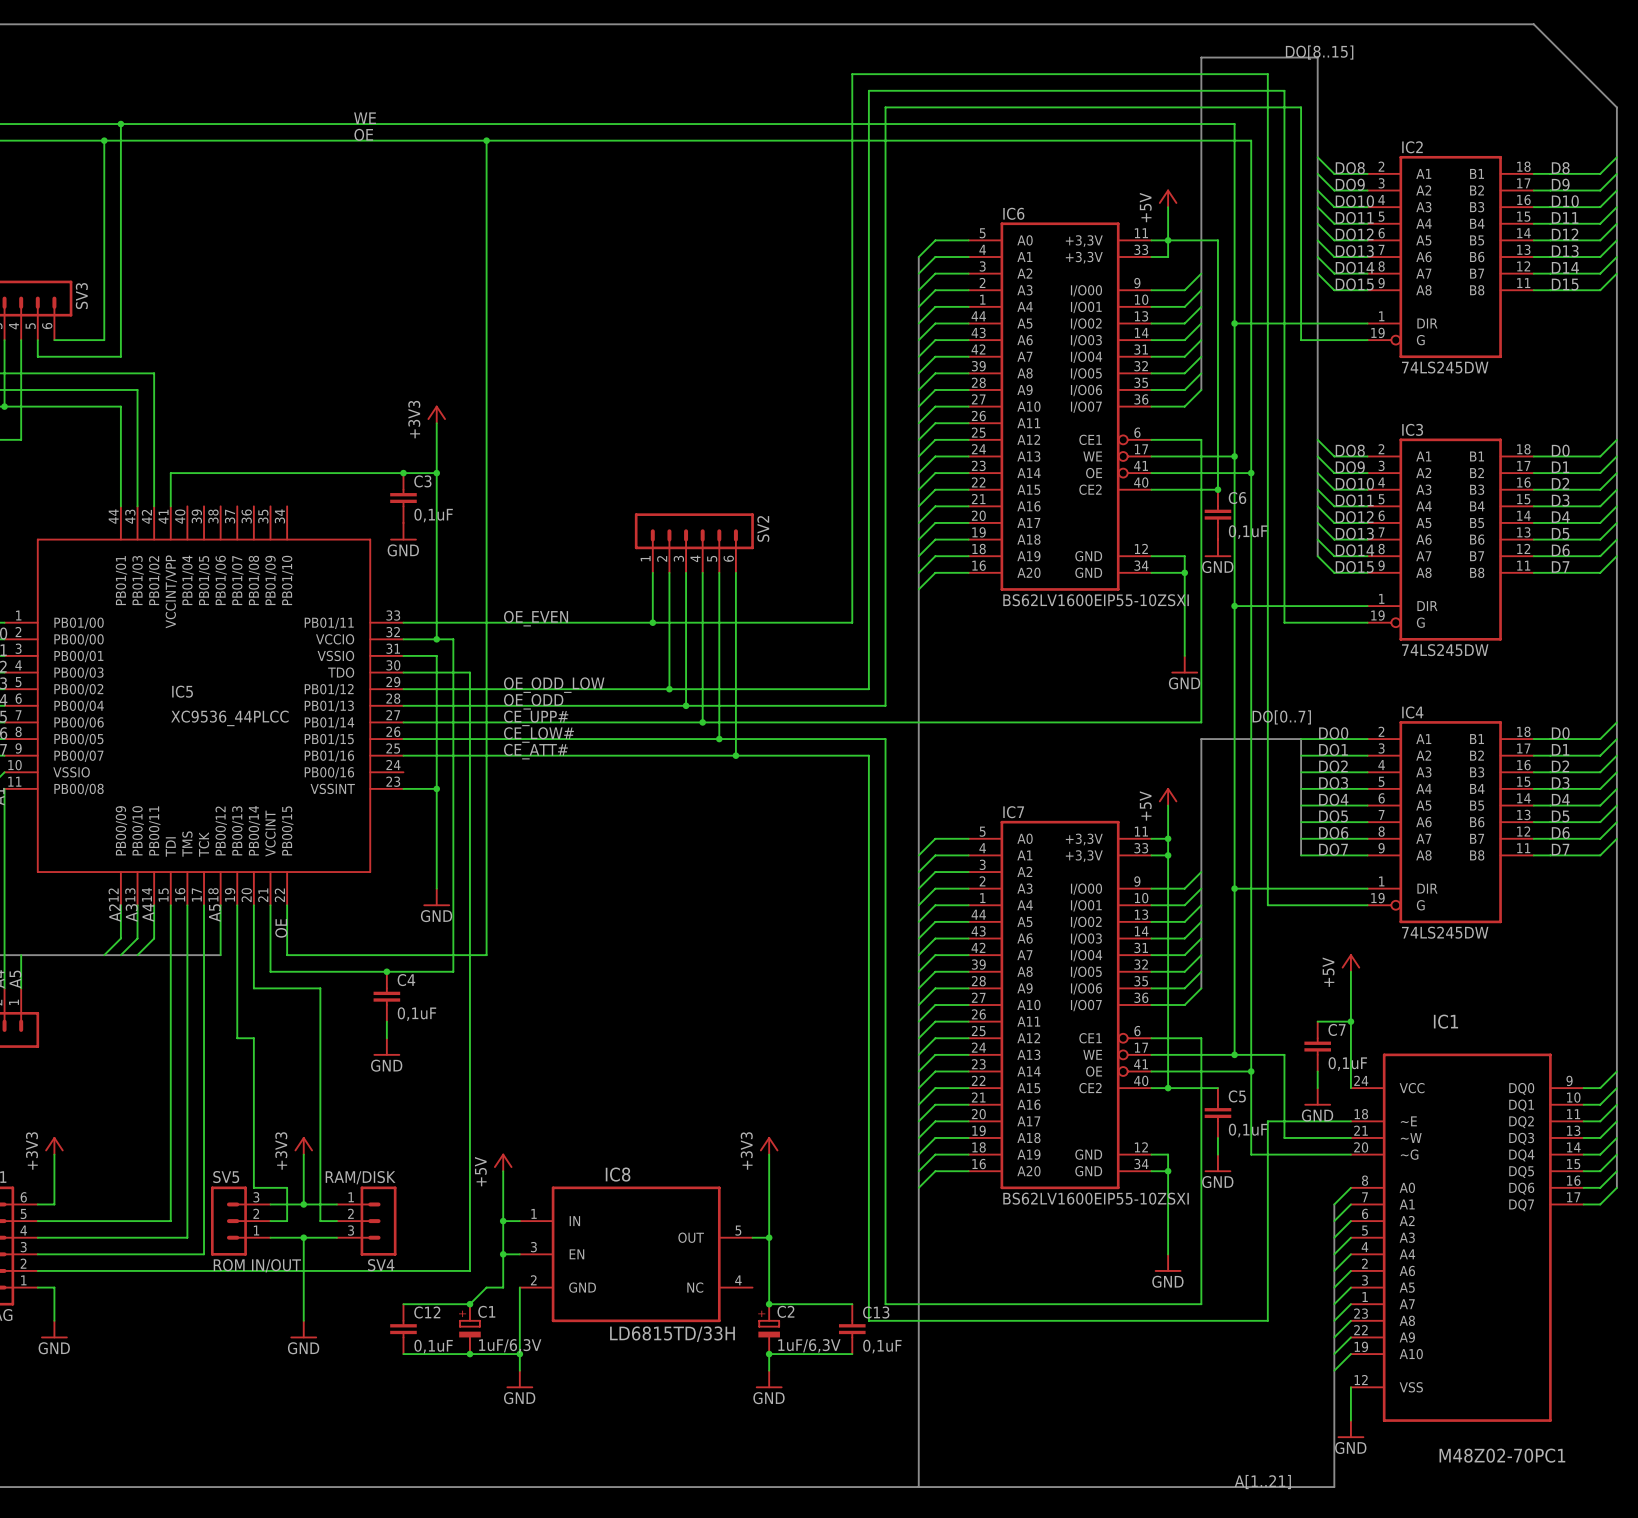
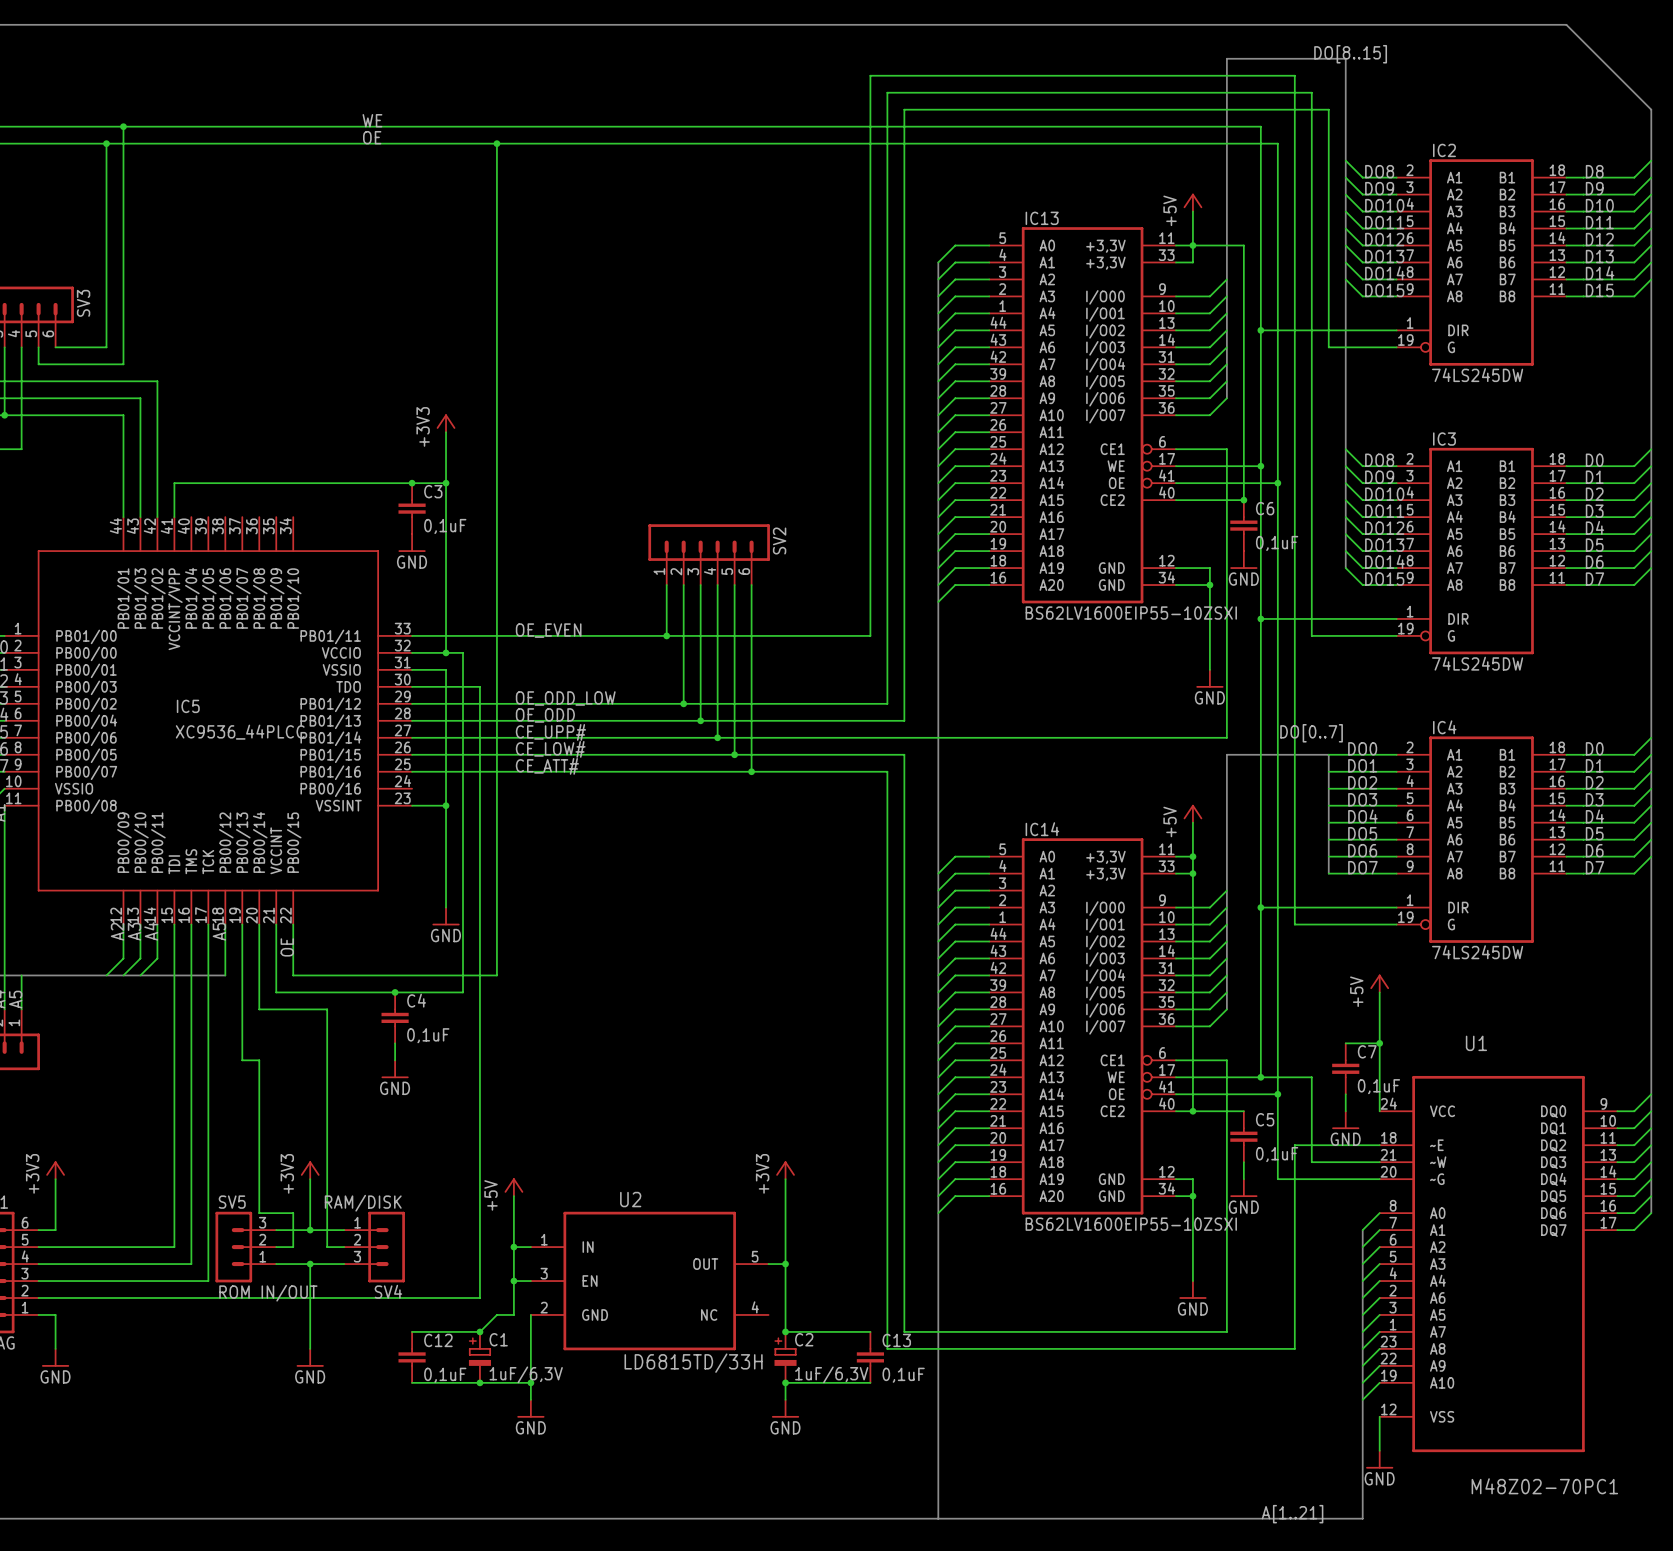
IC6 name: IC6 (1013, 213) -> IC13 (1042, 218)
IC7 name: IC7 (1013, 812) -> IC14 (1042, 829)
IC1 name: IC1 (1445, 1021) -> U1 (1476, 1043)
IC8 name: IC8 (618, 1174) -> U2 (630, 1199)

